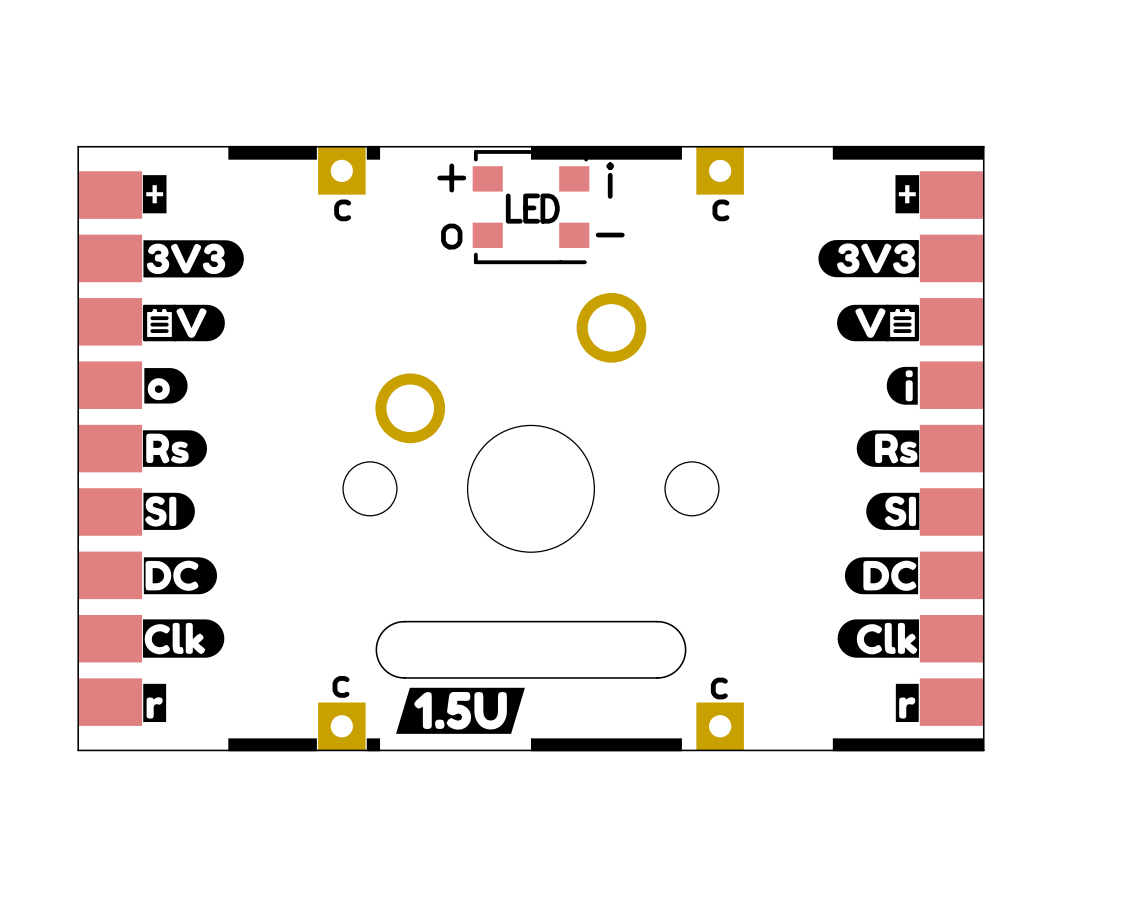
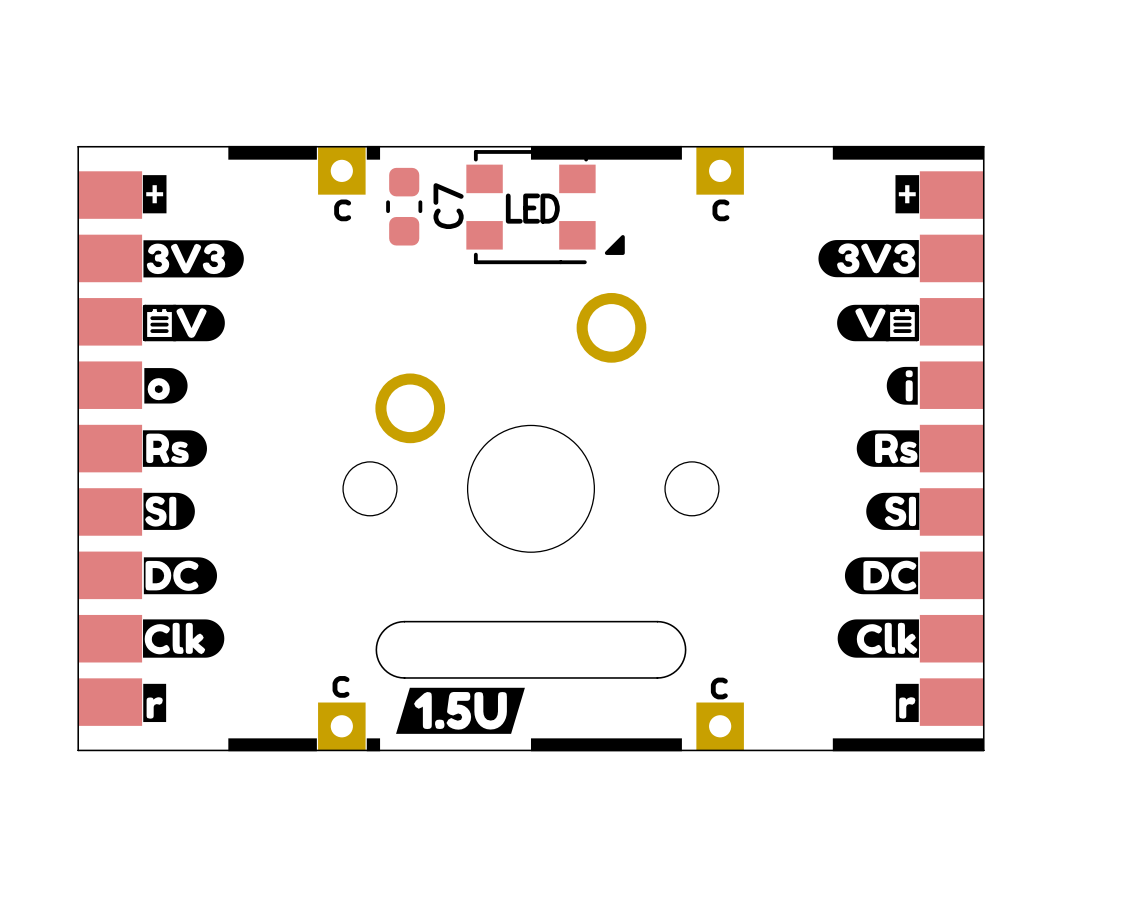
part footprint: [472, 150, 590, 265] -> [466, 150, 625, 265]
C7: none -> (404, 206)

